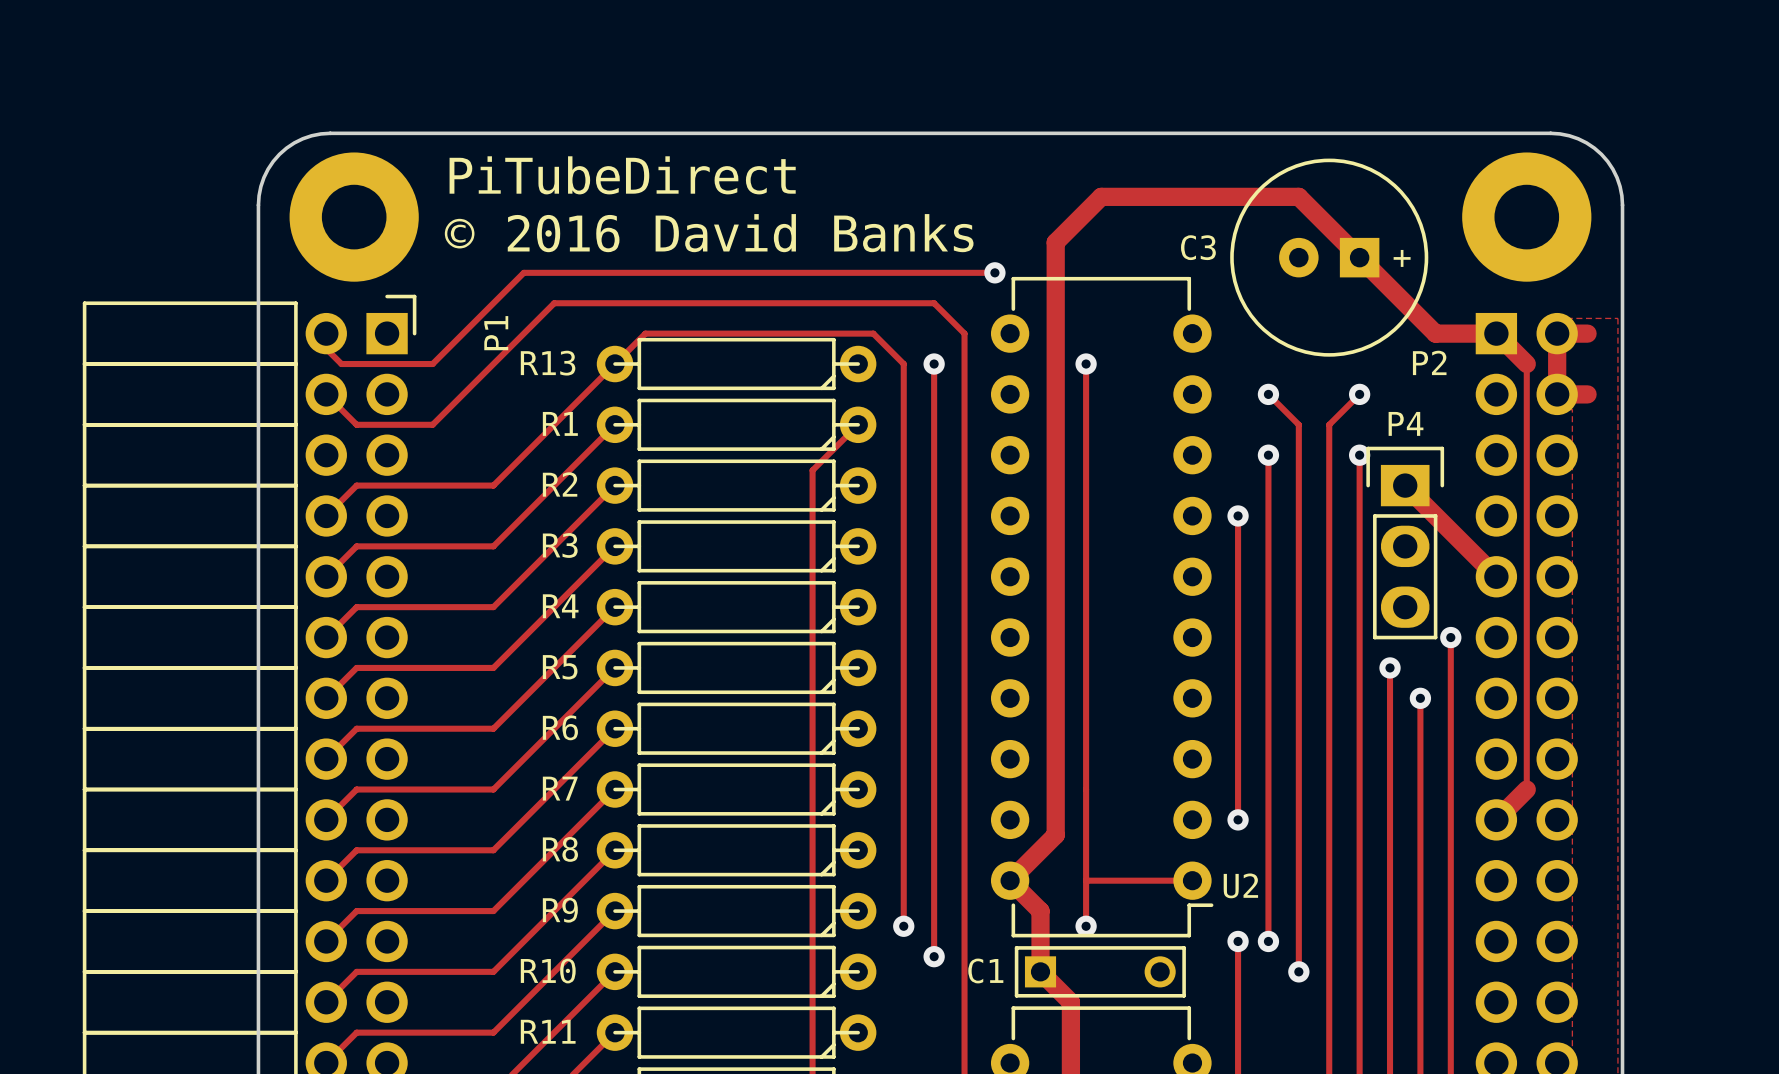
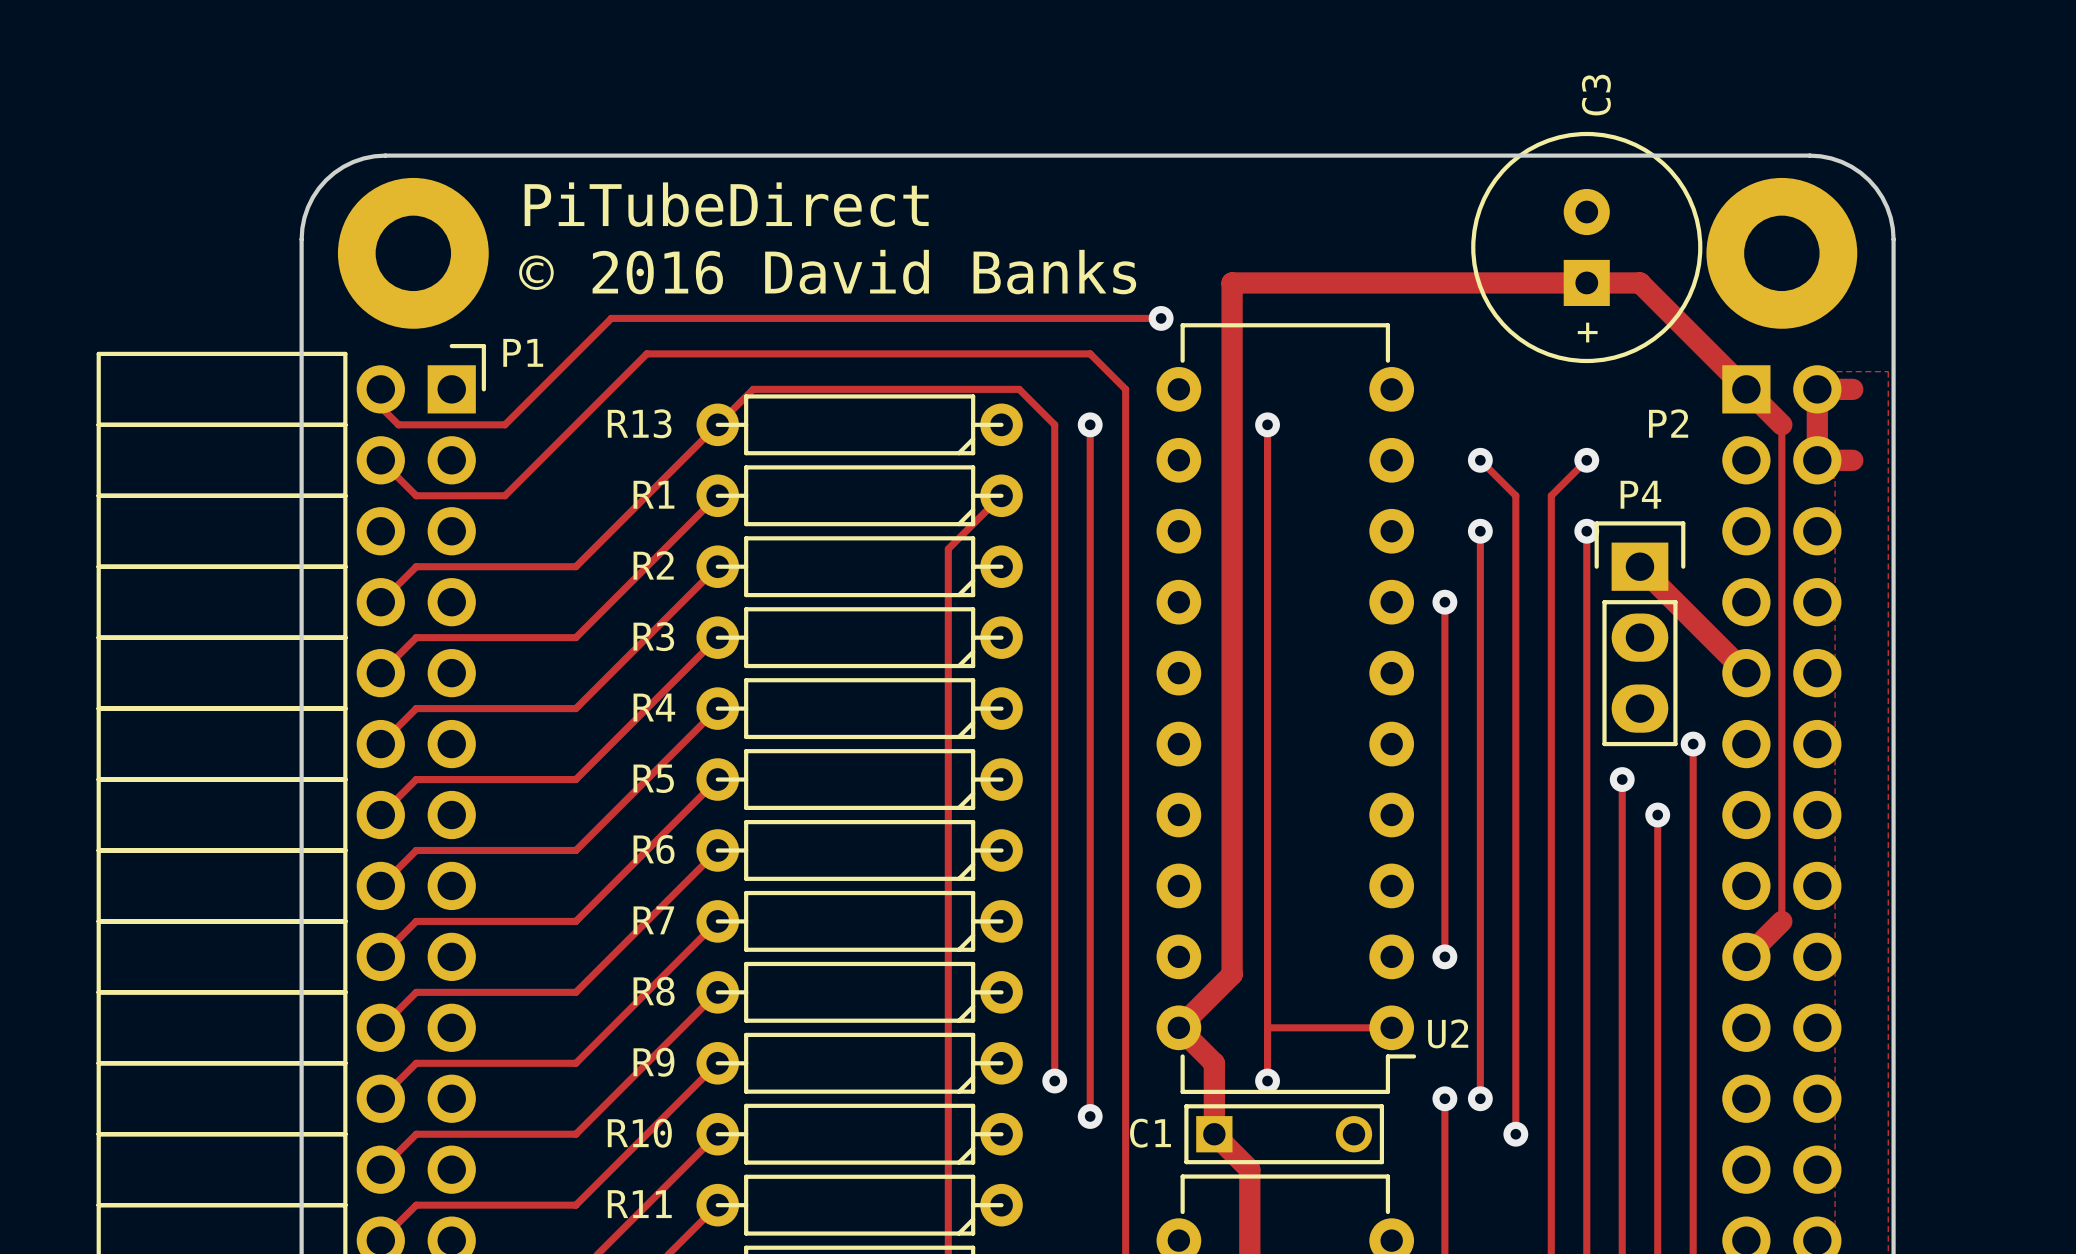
track: (1055, 242) (1101, 196) (1298, 196) (1435, 333) (1496, 333) -> (1232, 282) (1639, 282) (1746, 389)
C3 rotation: 0° (1329, 257) -> 90° clockwise (1586, 247)
P1 name rotation: 0° (496, 333) -> 90° clockwise (523, 352)
P1 name position: P1 (496, 333) -> P1 (523, 352)

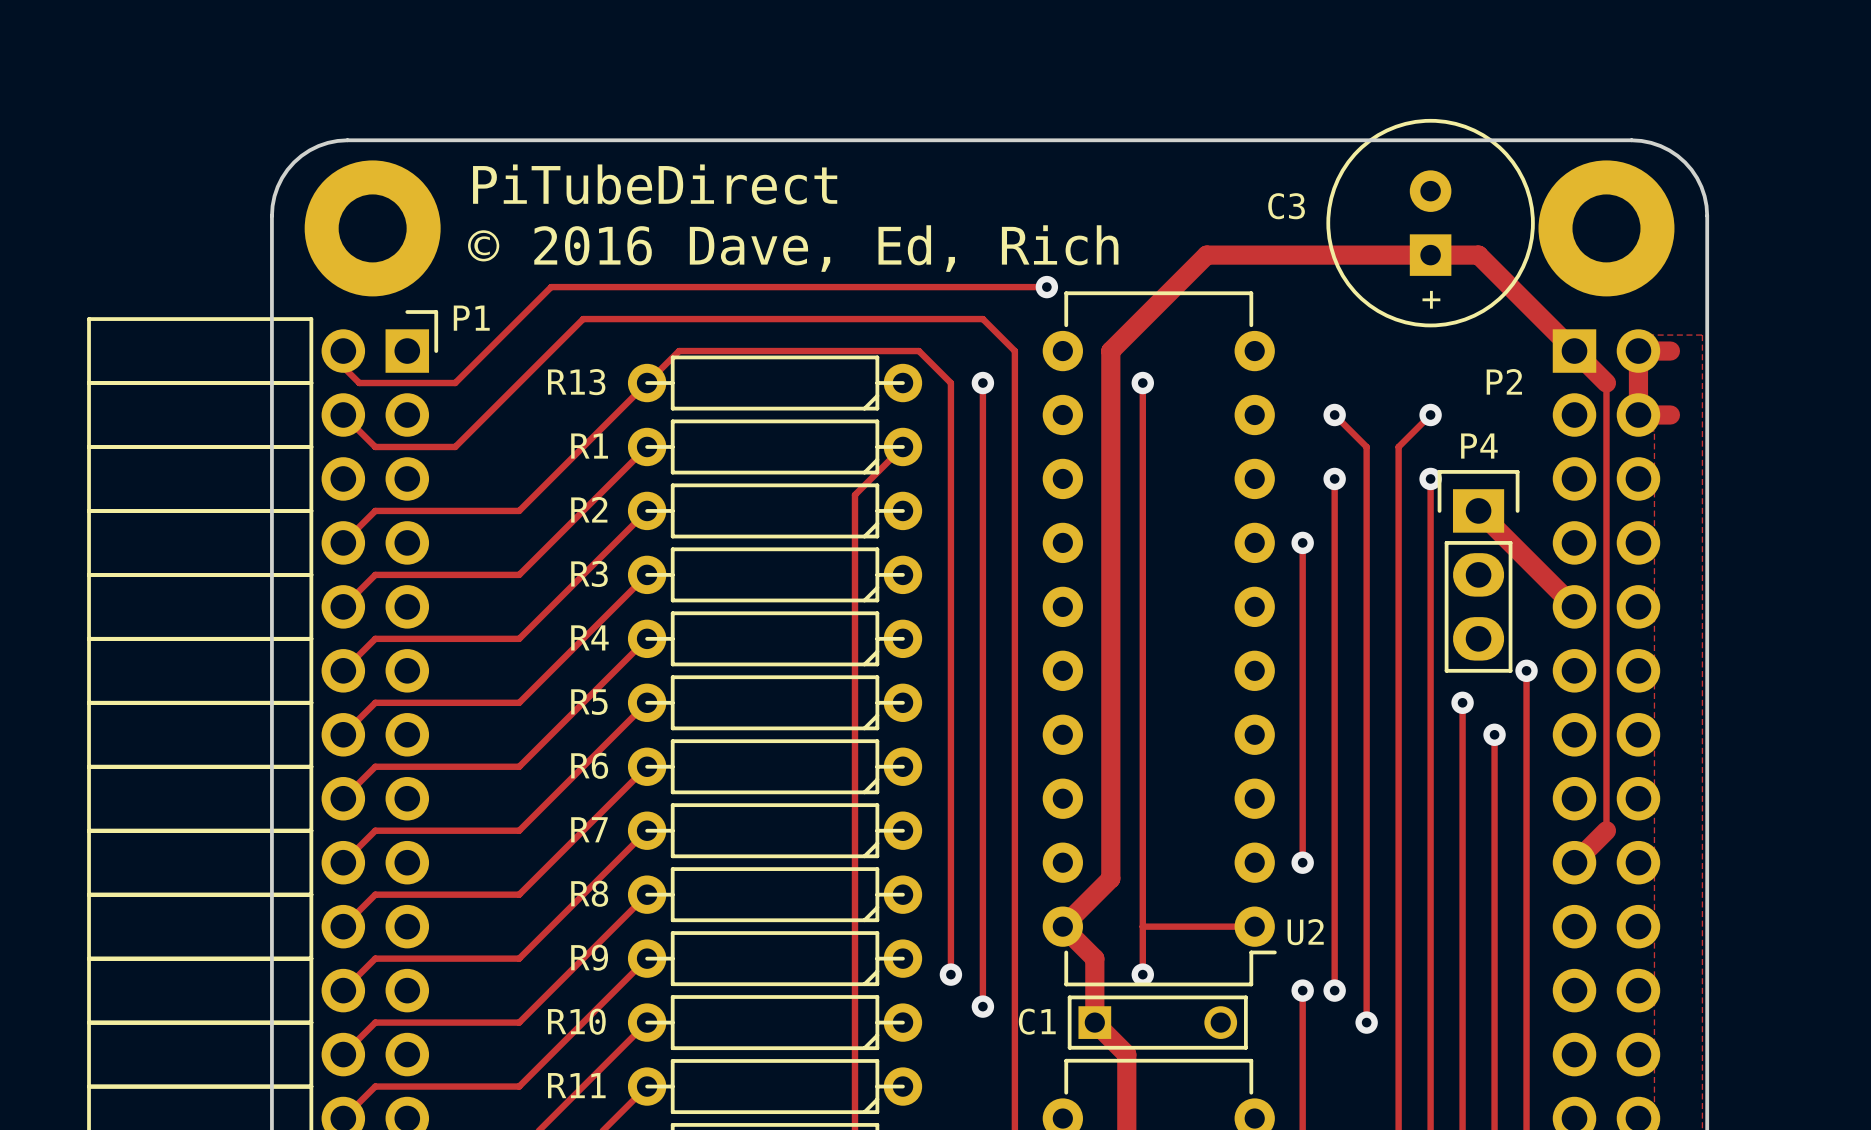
C3 name rotation: 0° (1596, 95) -> 90° clockwise (1286, 206)
C3 name position: C3 (1596, 95) -> C3 (1286, 206)
text: © 2016 David Banks (827, 272) -> © 2016 Dave, Ed, Rich (793, 248)
track: (1338, 282) (1232, 282) (1232, 389) -> (1206, 255) (1110, 351)

